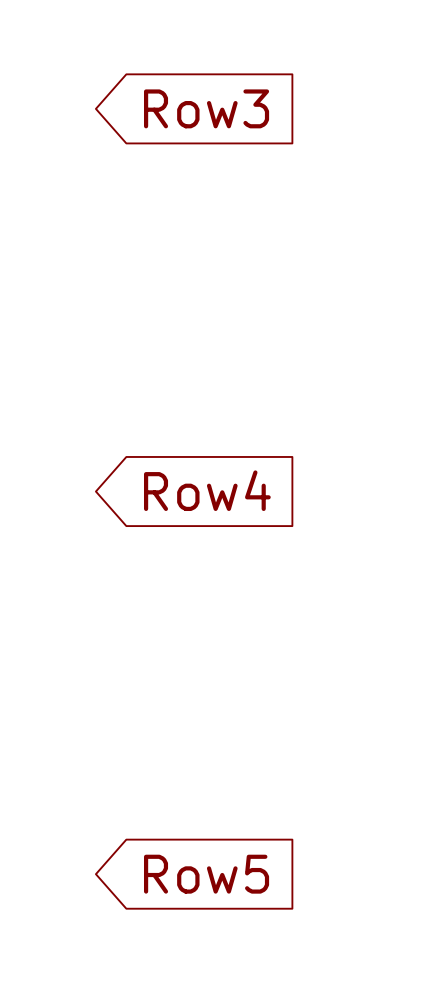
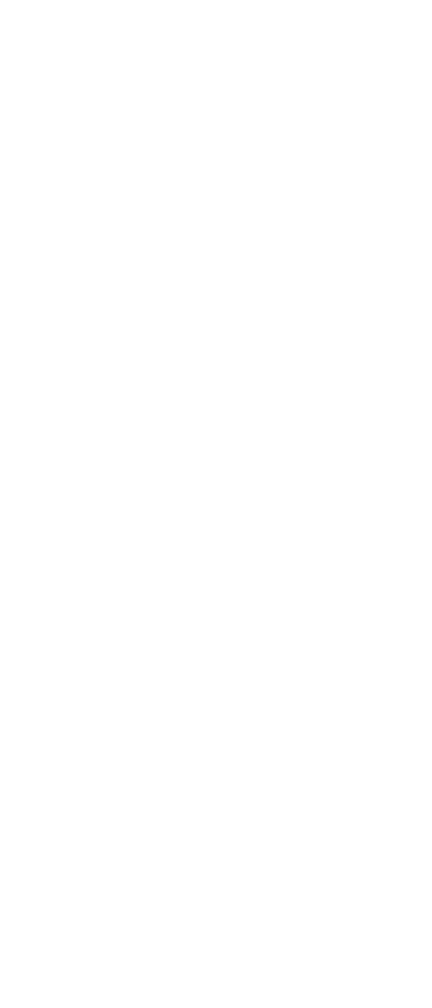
global label: Row3 (206, 108) -> none
global label: Row4 (207, 490) -> none
global label: Row5 (206, 874) -> none

